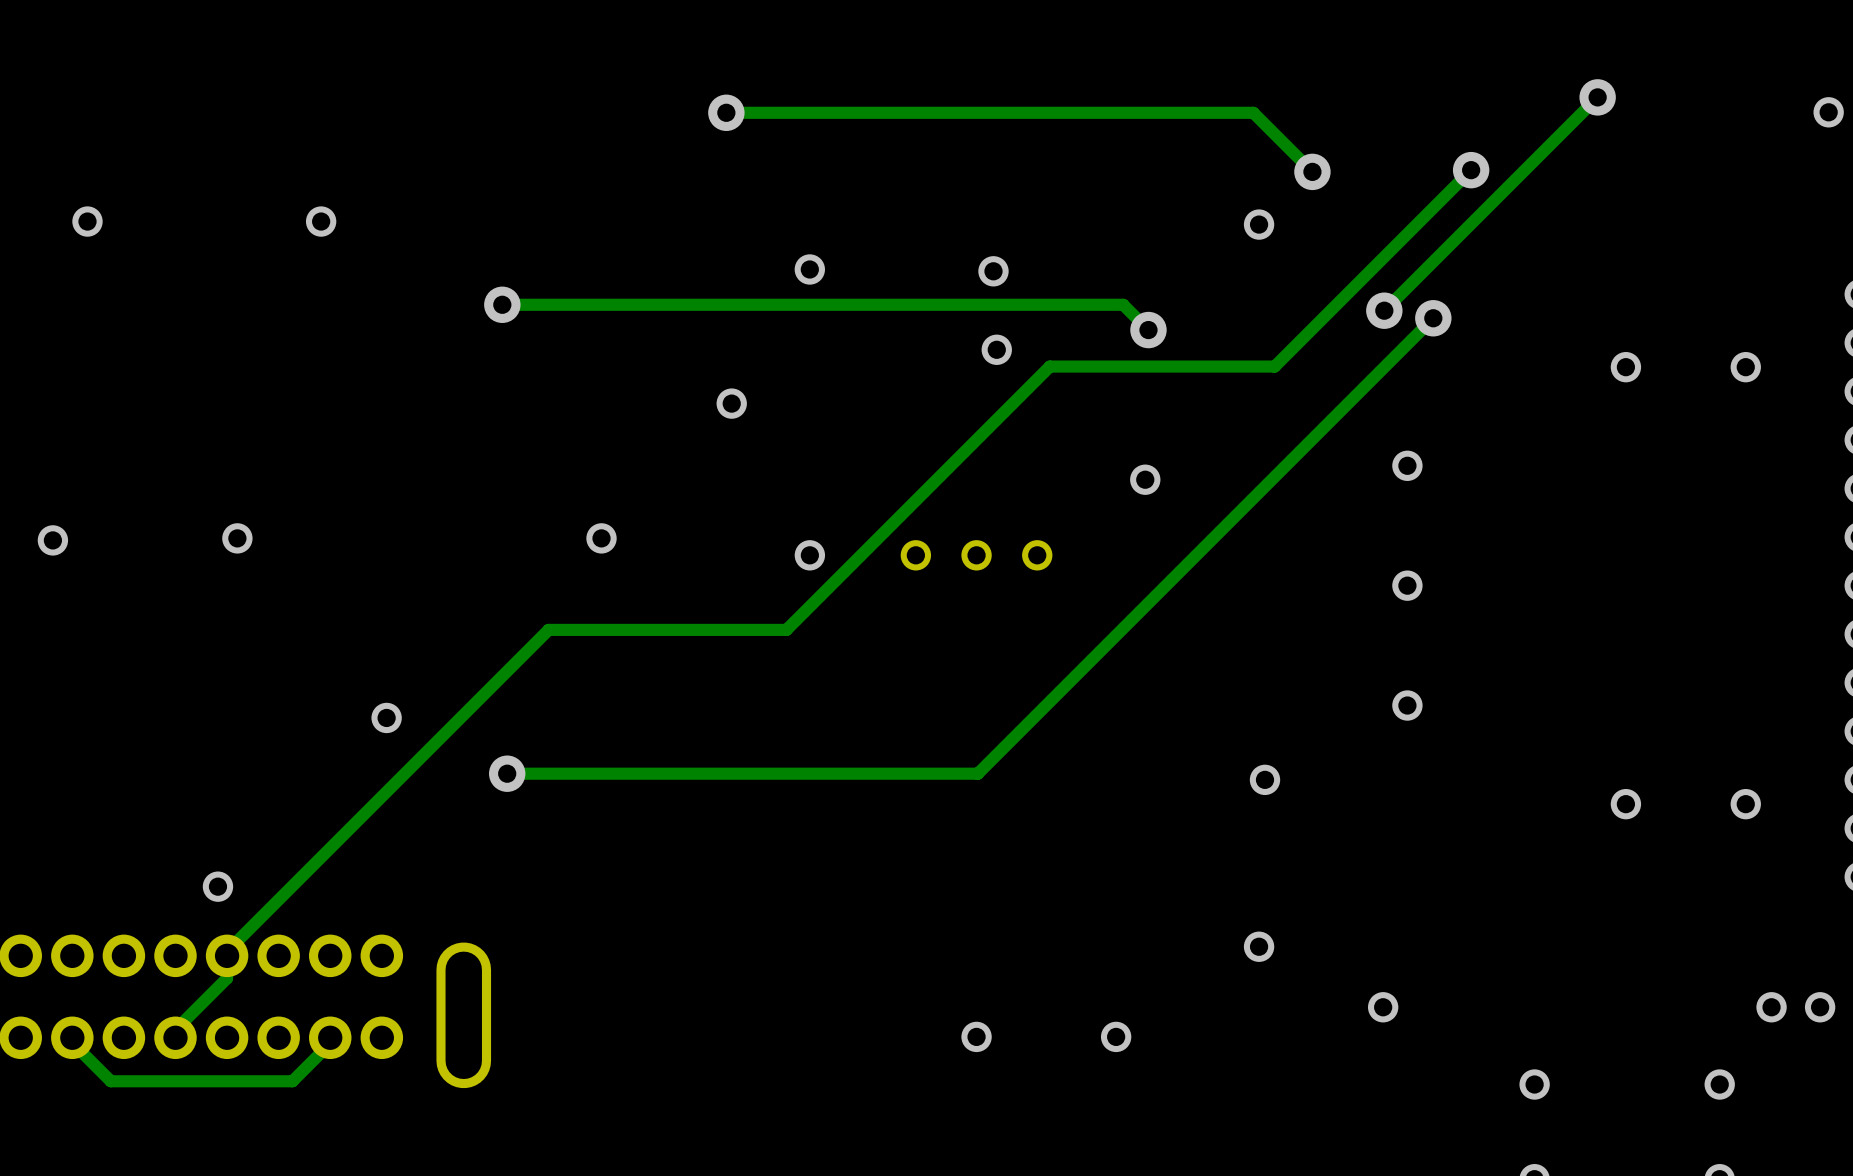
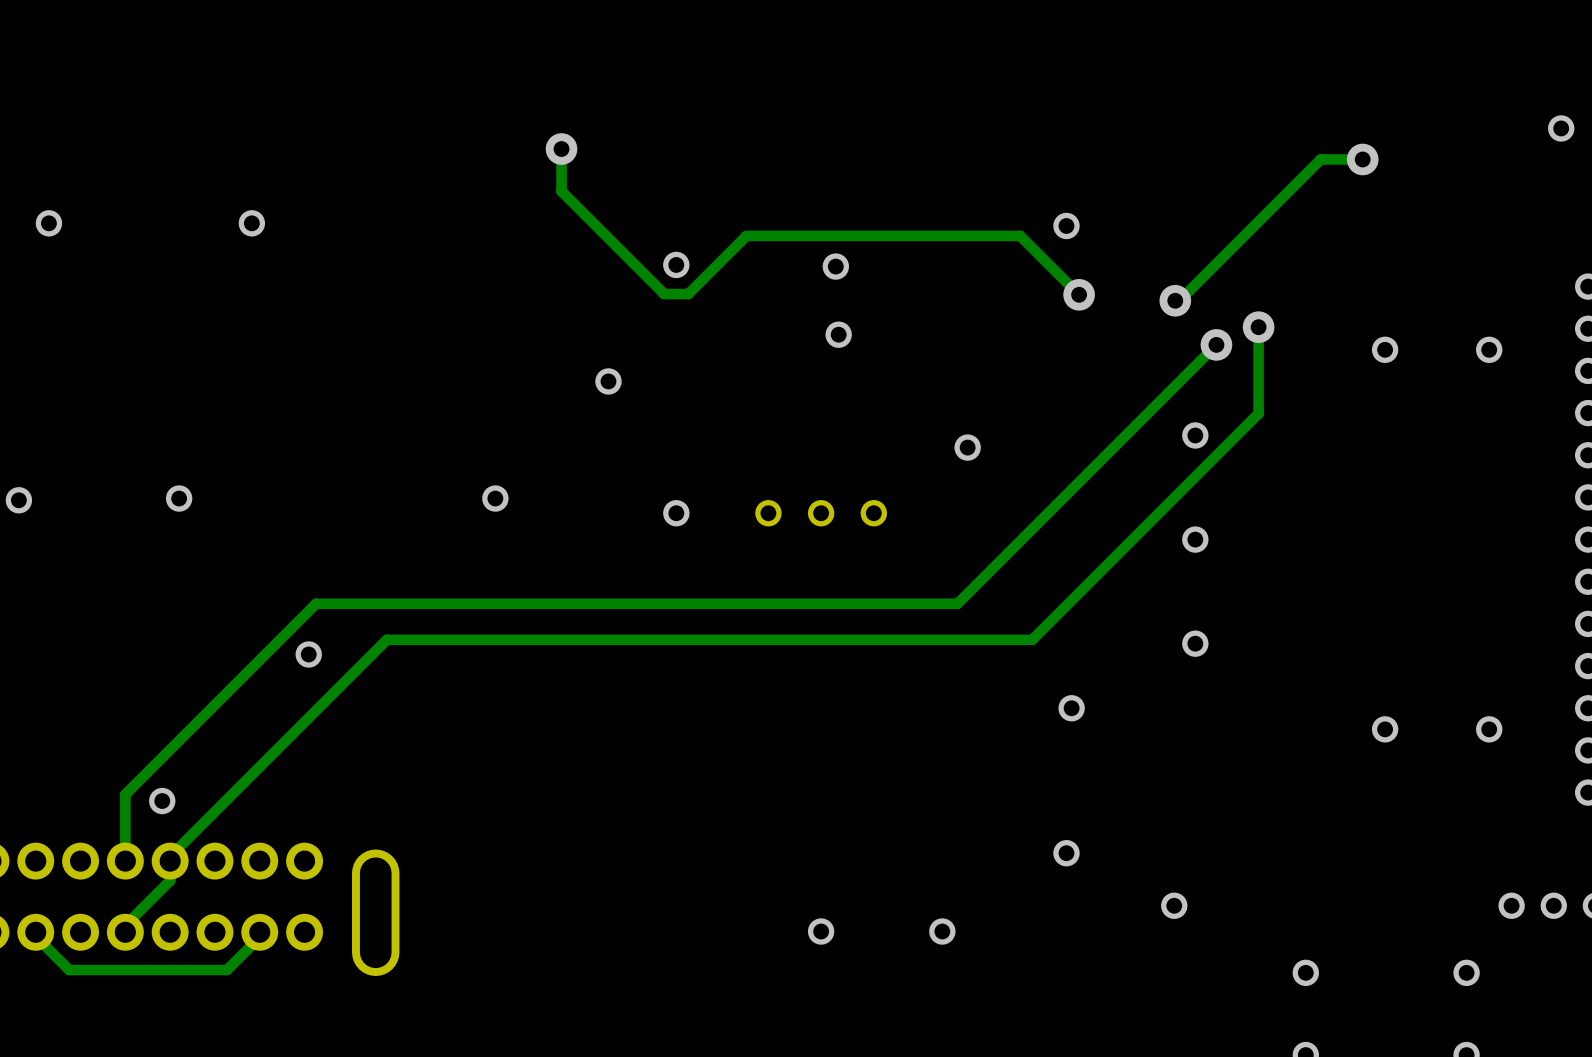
track: (1597, 97) (1384, 310) -> none
via position: (1597, 97) -> (1362, 159)
track: (726, 112) (1253, 112) (1312, 171) -> none
via position: (726, 112) -> (561, 149)
track: none -> (561, 149) (561, 191) (664, 294) (688, 294) (746, 235) (1020, 235) (1079, 294)
track: none -> (1362, 159) (1320, 159) (1174, 305)
track: (1471, 170) (1274, 366) (1049, 366) (786, 629) (548, 629) (227, 951) -> (1258, 327) (1258, 413) (1032, 639) (386, 639) (170, 856)
via: (1471, 170) -> none
via: (1312, 171) -> none
via: none -> (1079, 294)
track: (502, 304) (1123, 304) (1148, 330) -> none
via: (502, 304) -> none
track: (1433, 318) (977, 773) (507, 773) -> none
via: (1433, 318) -> none
via: (1148, 330) -> none
via: none -> (1258, 327)
track: none -> (1216, 344) (957, 603) (316, 603) (125, 794) (125, 861)
via: none -> (1216, 344)
via: (507, 773) -> none

